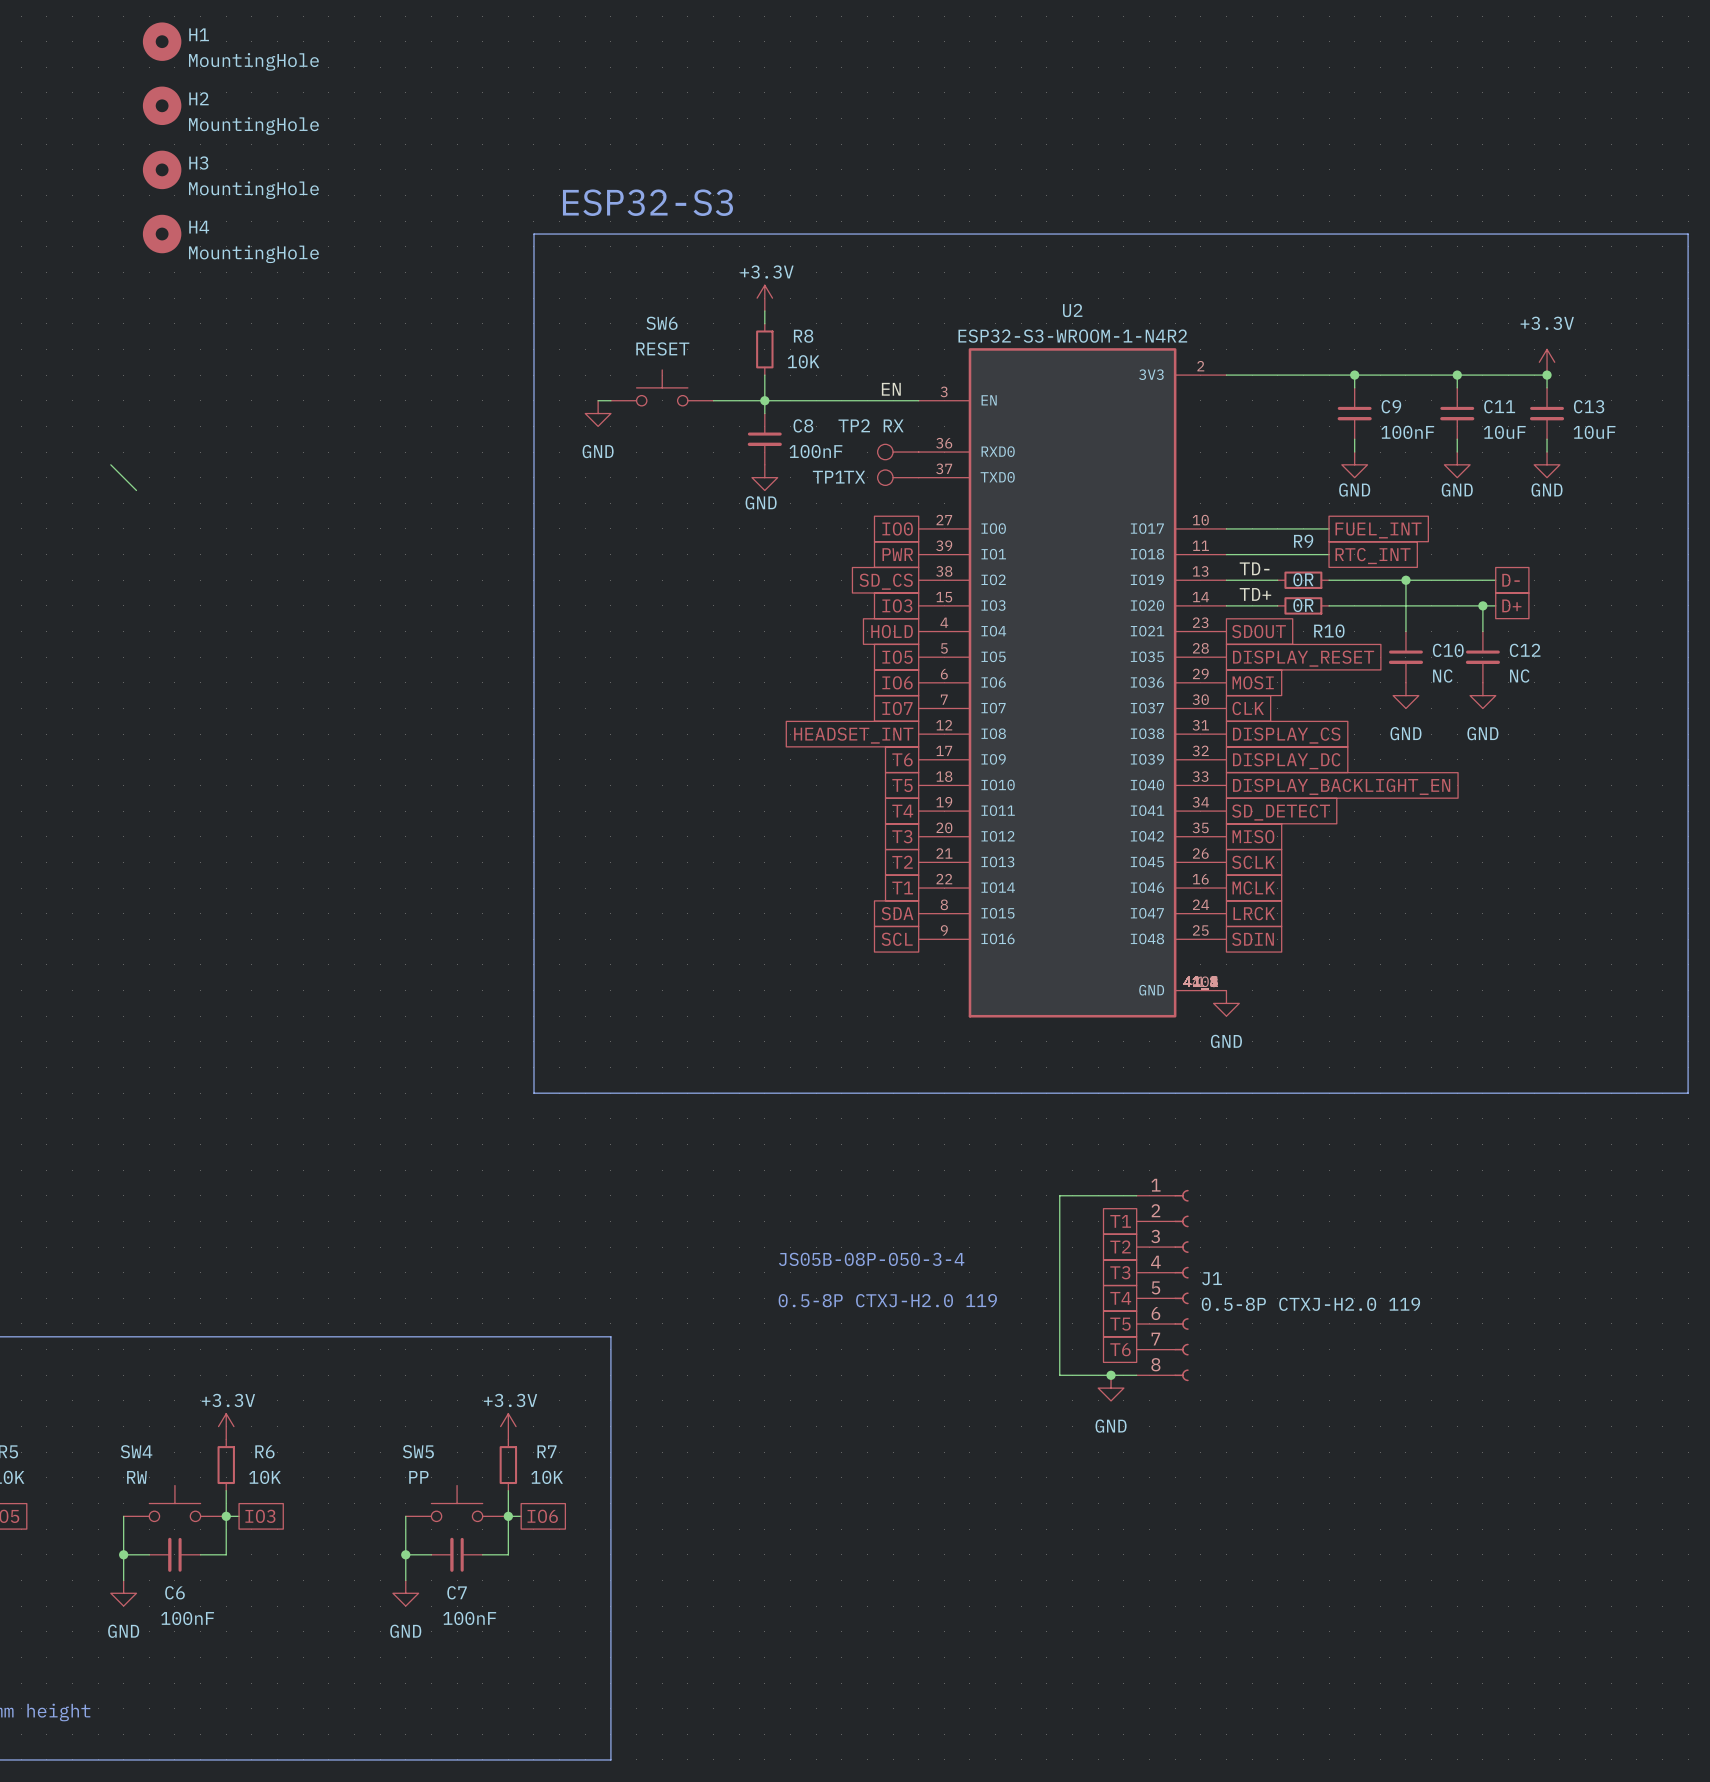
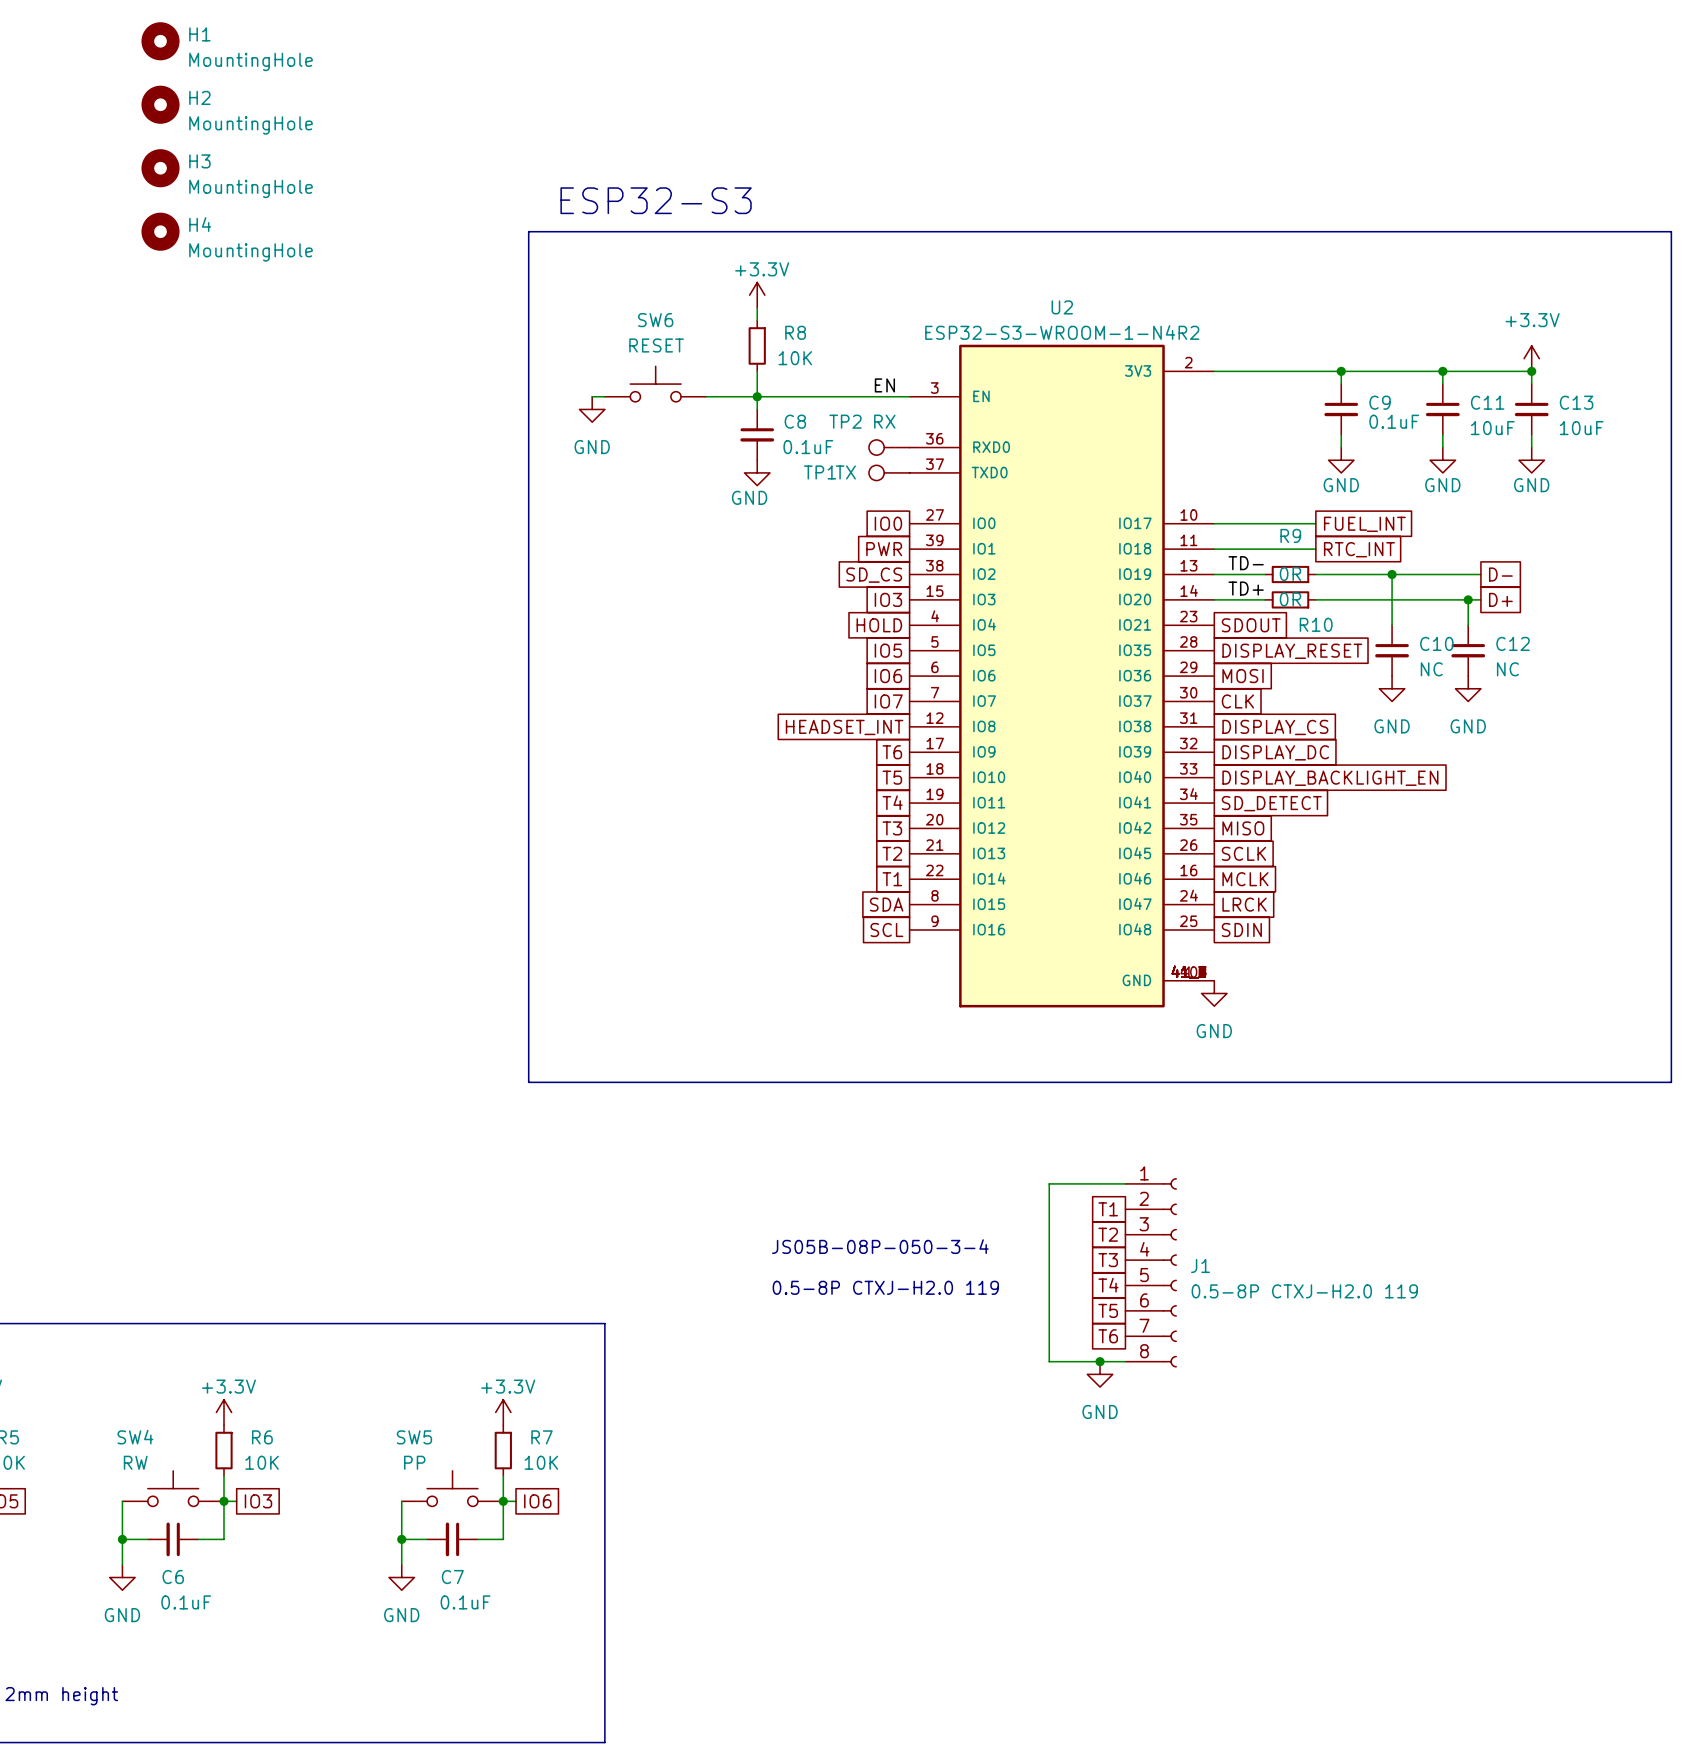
C9 value: 100nF (1407, 432) -> 0.1uF (1394, 421)
C8 value: 100nF (815, 451) -> 0.1uF (808, 447)
wire: (110, 464) (136, 490) -> none
C6 value: 100nF (187, 1618) -> 0.1uF (186, 1602)
C7 value: 100nF (469, 1618) -> 0.1uF (465, 1602)

